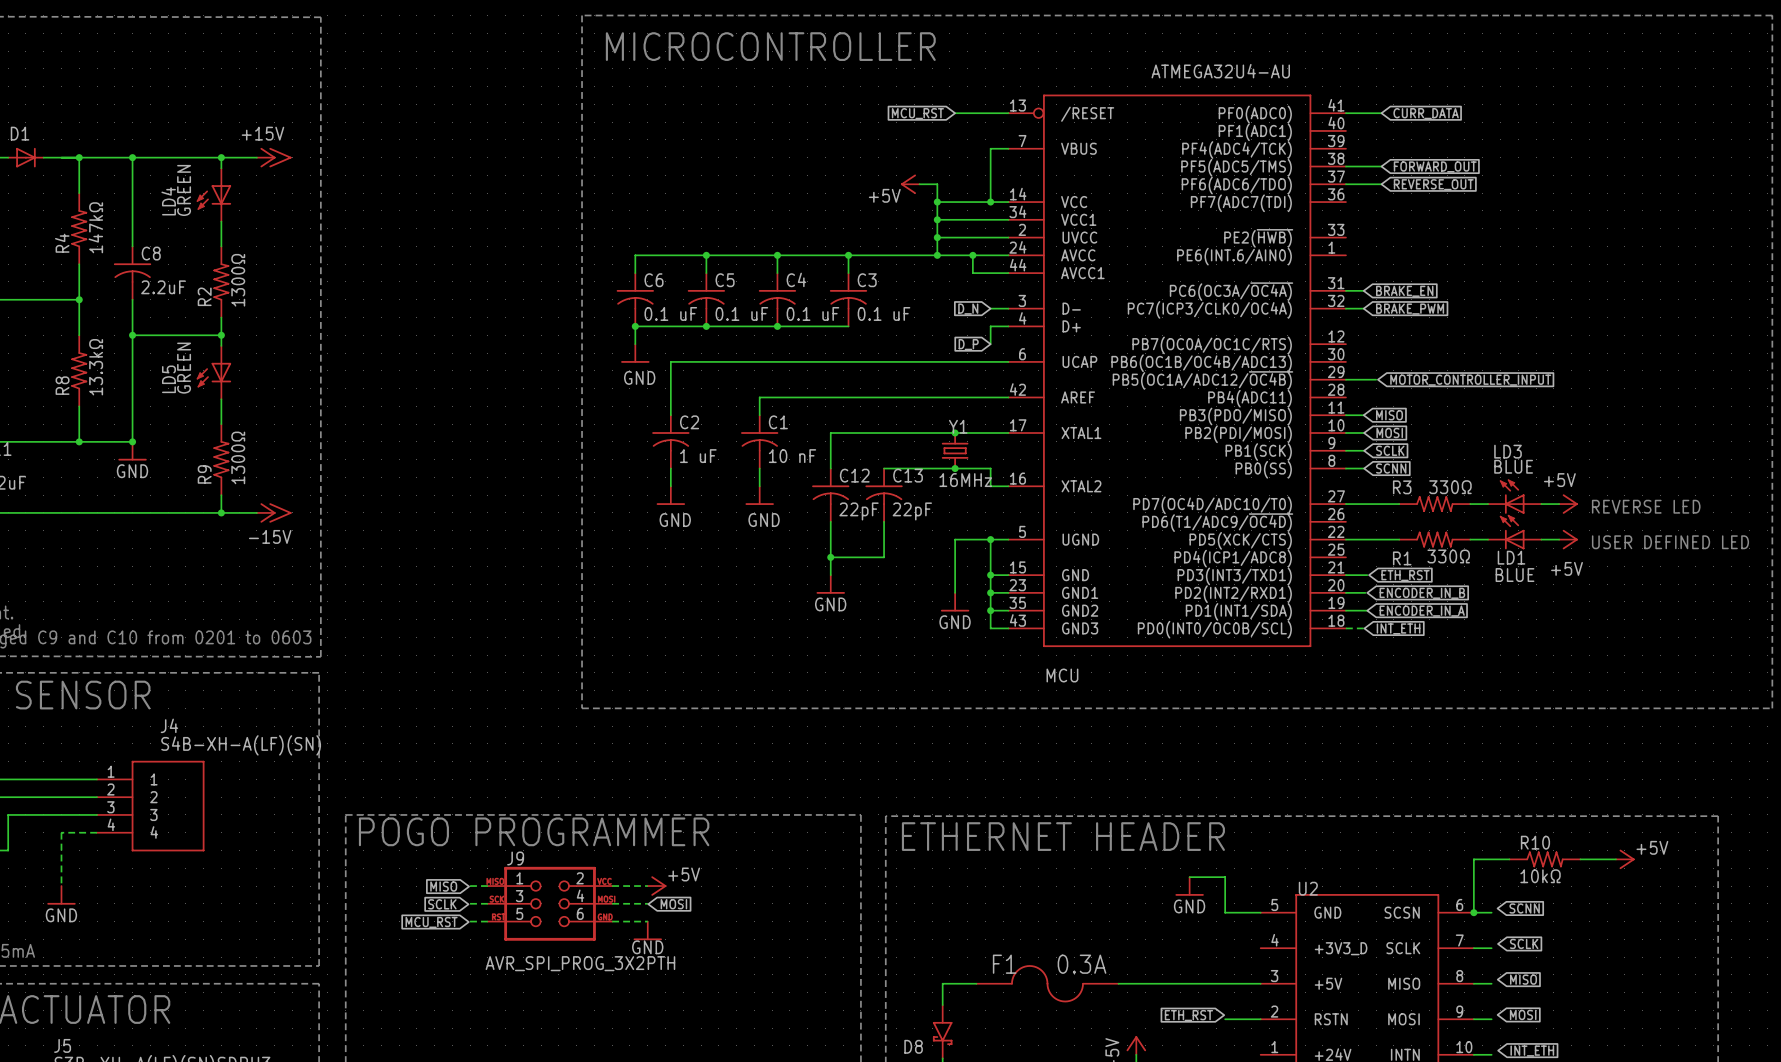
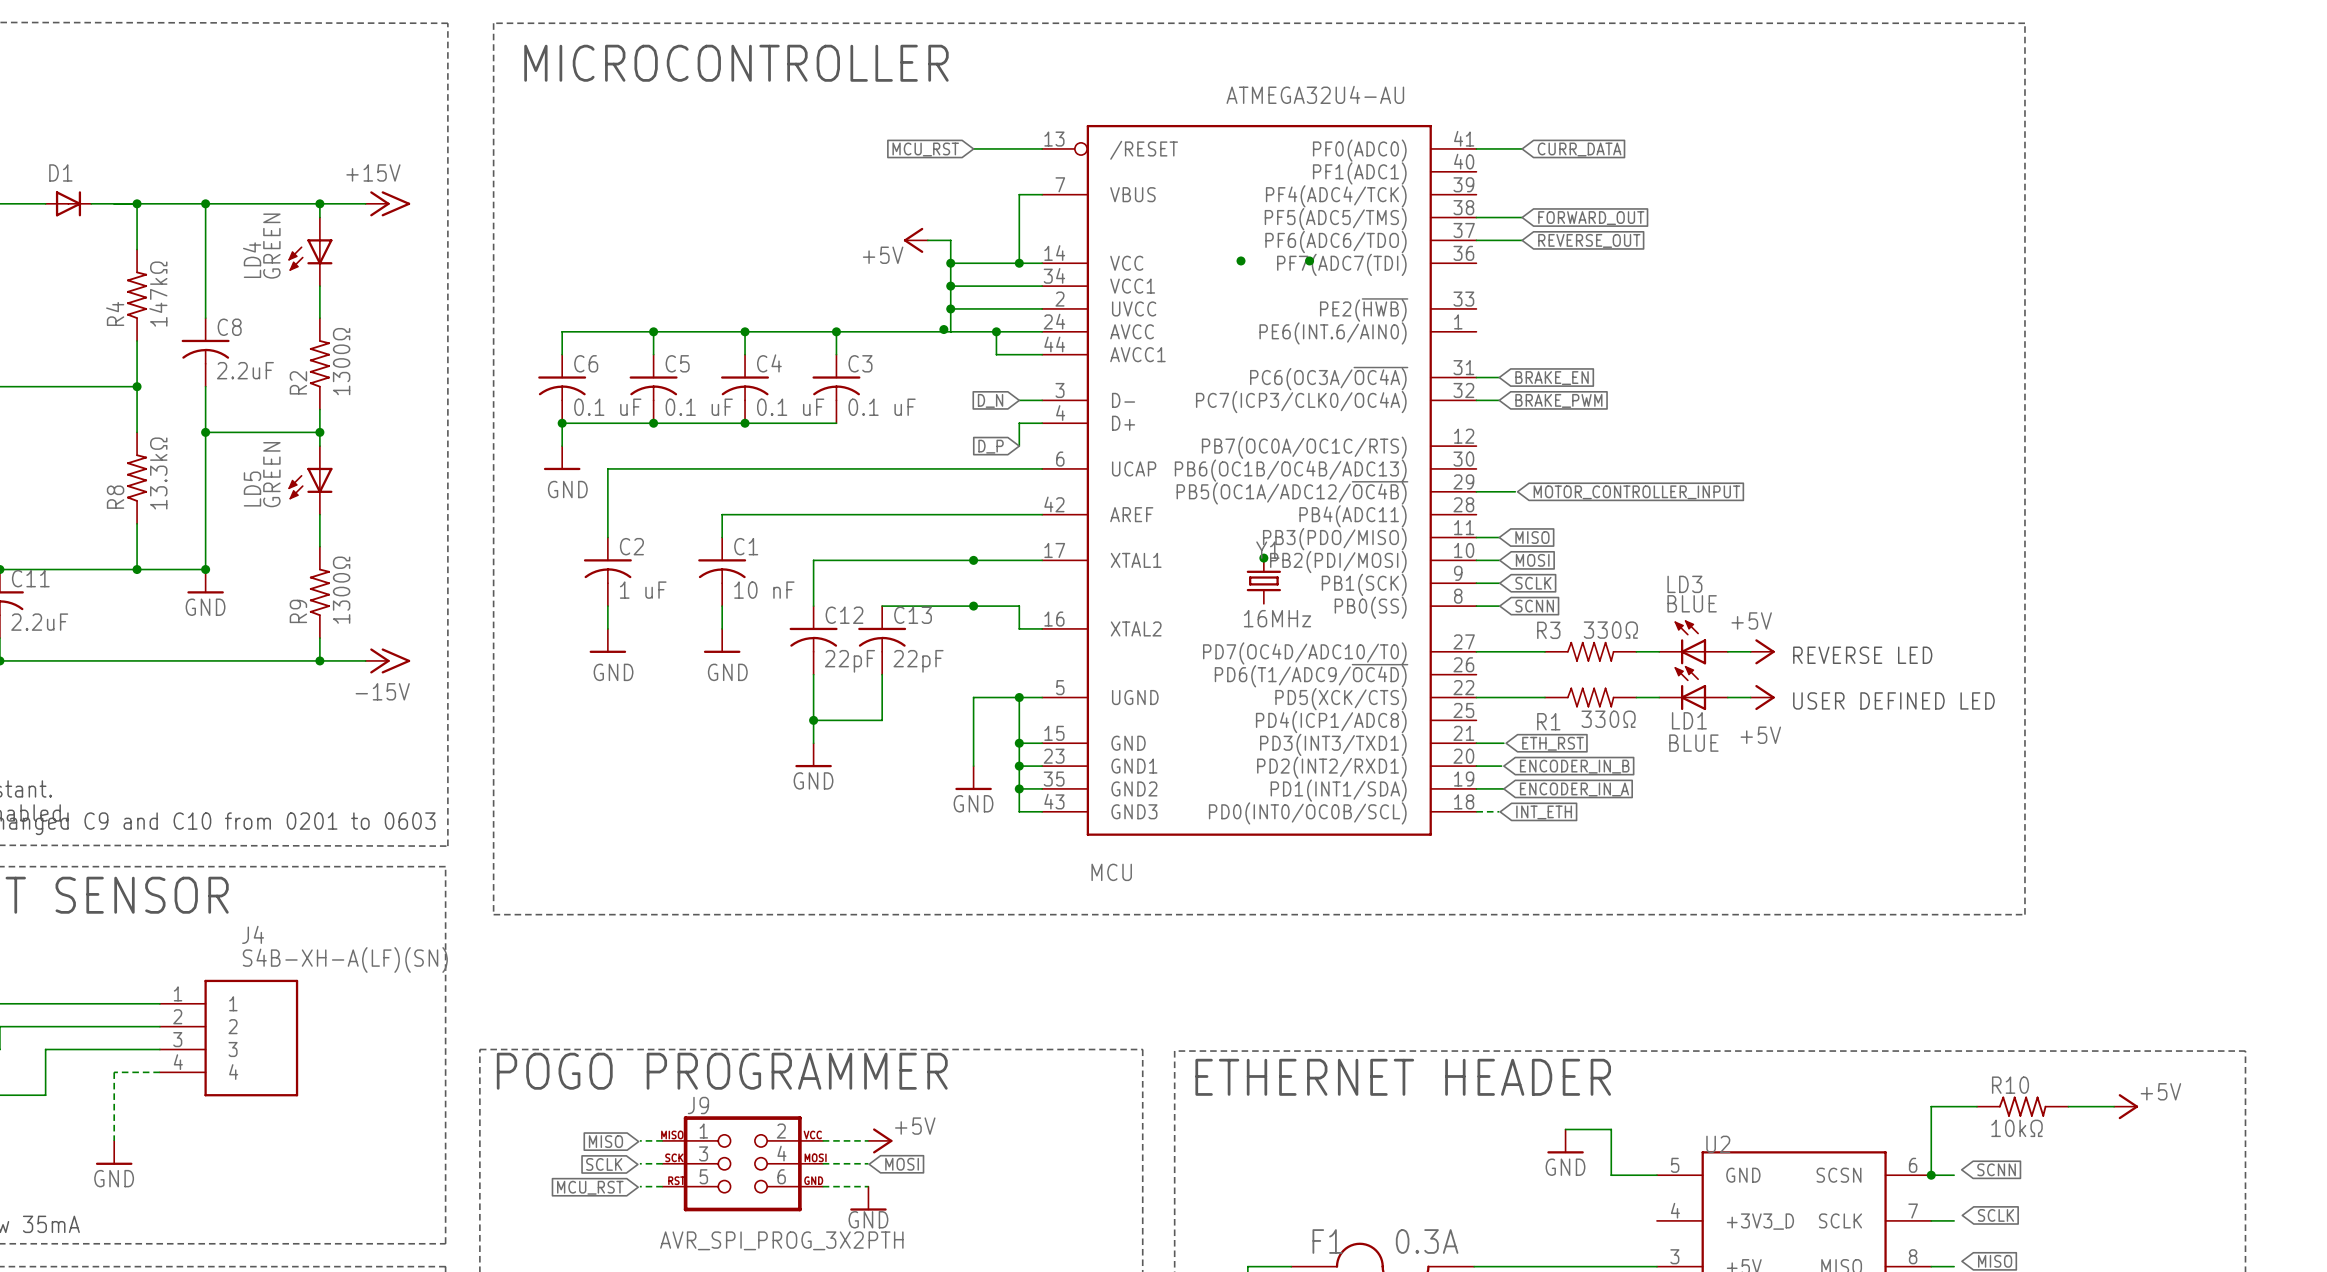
line: (582, 15) (582, 708) (1772, 708) (1772, 15) (582, 15) -> (493, 23) (493, 914) (2024, 914) (2024, 23) (493, 23)
text: MICROCONTROLLER (770, 46) -> none
text: none -> MICROCONTROLLER (736, 63)
global label: MCU_RST (917, 113) -> none
wire: (955, 113) (1008, 113) -> none
wire: (1345, 113) (1381, 113) -> none
global label: CURR_DATA (1426, 113) -> none
wire: none -> (973, 148) (1042, 148)
wire: none -> (1476, 148) (1522, 148)
global label: none -> MCU_RST (925, 149)
global label: none -> CURR_DATA (1579, 149)
wire: (1008, 148) (990, 148) (990, 202) -> none
wire: none -> (1042, 194) (1019, 194) (1019, 263)
wire: (1345, 166) (1381, 166) -> none
global label: FORWARD_OUT (1435, 166) -> none
wire: none -> (1476, 217) (1522, 217)
global label: none -> FORWARD_OUT (1591, 218)
power symbol: +5V (910, 184) -> none
wire: (919, 184) (937, 184) (937, 255) -> none
wire: (1345, 184) (1381, 184) -> none
global label: REVERSE_OUT (1433, 184) -> none
power symbol: none -> +5V (915, 240)
wire: none -> (927, 240) (950, 240) (950, 331)
wire: none -> (1476, 240) (1522, 240)
global label: none -> REVERSE_OUT (1589, 240)
wire: (937, 202) (1008, 202) -> none
wire: none -> (950, 263) (1042, 263)
junction: none -> (950, 263)
junction: none -> (1019, 263)
wire: (937, 219) (1008, 219) -> none
junction: (937, 219) -> none
wire: none -> (950, 286) (1042, 286)
junction: none -> (950, 286)
wire: (937, 237) (1008, 237) -> none
junction: (937, 237) -> none
wire: none -> (950, 308) (1042, 308)
junction: none -> (950, 308)
wire: (706, 255) (706, 273) -> (745, 331) (745, 354)
wire: (777, 255) (777, 273) -> (836, 331) (836, 354)
junction: (777, 255) -> none
wire: (848, 255) (848, 273) -> none
junction: (848, 255) -> none
junction: (937, 255) -> none
wire: (972, 255) (972, 273) (1008, 273) -> none
junction: (972, 255) -> none
wire: (1008, 255) (635, 255) (635, 273) -> none
wire: none -> (653, 331) (653, 354)
junction: none -> (653, 331)
junction: none -> (745, 331)
junction: none -> (836, 331)
wire: none -> (996, 331) (996, 354) (1042, 354)
junction: none -> (996, 331)
wire: none -> (1042, 331) (562, 331) (562, 354)
wire: (1345, 290) (1363, 290) -> none
global label: BRAKE_EN (1404, 291) -> none
wire: none -> (1476, 377) (1499, 377)
global label: none -> BRAKE_EN (1552, 378)
C6 position: (635, 299) -> (562, 388)
C5 position: (706, 299) -> (653, 388)
C4 position: (777, 299) -> (745, 388)
C3 position: (848, 299) -> (836, 388)
wire: (990, 308) (1008, 308) -> (1476, 400) (1499, 400)
wire: (1345, 308) (1363, 308) -> none
global label: D_N (968, 309) -> none
global label: BRAKE_PWM (1410, 309) -> none
global label: none -> D_N (990, 400)
wire: none -> (1019, 400) (1042, 400)
global label: none -> BRAKE_PWM (1558, 400)
junction: (635, 326) -> none
junction: (706, 326) -> none
junction: (777, 326) -> none
wire: (848, 326) (635, 326) (635, 344) -> none
wire: (1008, 326) (990, 326) (990, 344) -> none
junction: none -> (562, 423)
junction: none -> (653, 423)
junction: none -> (745, 423)
wire: none -> (836, 423) (562, 423) (562, 446)
wire: none -> (1042, 423) (1019, 423) (1019, 446)
global label: D_P (968, 344) -> none
global label: none -> D_P (991, 446)
power symbol: GND (635, 353) -> none
power symbol: none -> GND (562, 458)
wire: (1008, 361) (670, 361) (670, 415) -> none
wire: none -> (1042, 468) (607, 468) (607, 537)
MCU: ATMEGA32U4-AU (1177, 370) -> none
MCU: none -> ATMEGA32U4-AU (1259, 480)
wire: (1345, 379) (1376, 379) -> none
global label: MOTOR_CONTROLLER_INPUT (1470, 380) -> none
wire: none -> (1476, 491) (1515, 491)
global label: none -> MOTOR_CONTROLLER_INPUT (1636, 492)
wire: (1008, 397) (759, 397) (759, 415) -> none
wire: none -> (1042, 514) (722, 514) (722, 537)
wire: (1345, 415) (1363, 415) -> none
global label: MISO (1389, 415) -> none
wire: none -> (1476, 537) (1499, 537)
global label: none -> MISO (1532, 537)
wire: (1008, 433) (830, 433) (830, 468) -> none
wire: (1345, 433) (1363, 433) -> (1636, 651) (1659, 651)
global label: MOSI (1389, 433) -> none
junction: none -> (973, 560)
wire: none -> (1042, 560) (813, 560) (813, 606)
wire: none -> (1476, 560) (1499, 560)
global label: none -> MOSI (1532, 560)
C2 position: (670, 441) -> (607, 571)
C1 position: (759, 441) -> (722, 571)
wire: (1345, 450) (1363, 450) -> none
global label: SCLK (1390, 450) -> none
wire: none -> (1476, 583) (1499, 583)
global label: none -> SCLK (1533, 583)
wire: (670, 468) (670, 486) -> (722, 606) (722, 628)
wire: (759, 468) (759, 486) -> none
wire: (884, 468) (990, 468) (990, 486) (1008, 486) -> none
junction: (955, 468) -> none
wire: (1345, 468) (1363, 468) -> (1636, 697) (1659, 697)
global label: SCNN (1391, 468) -> none
wire: none -> (607, 606) (607, 628)
wire: none -> (882, 606) (1019, 606) (1019, 628) (1042, 628)
junction: none -> (973, 606)
global label: none -> SCNN (1534, 606)
power symbol: GND (670, 495) -> none
power symbol: GND (759, 495) -> none
C12 position: (830, 495) -> (813, 640)
C13 position: (884, 495) -> (882, 640)
LD3 position: (1514, 496) -> (1693, 642)
power symbol: none -> GND (607, 640)
power symbol: none -> GND (722, 640)
wire: (1345, 504) (1399, 504) -> none
R3 position: (1434, 504) -> (1590, 651)
wire: (1470, 504) (1488, 504) -> (1727, 651) (1750, 651)
wire: (1541, 504) (1559, 504) -> none
power symbol: +5V (1568, 504) -> none
wire: none -> (1476, 651) (1544, 651)
power symbol: none -> +5V (1762, 651)
text: REVERSE LED (1646, 506) -> none
text: none -> REVERSE LED (1862, 655)
wire: (830, 521) (830, 575) -> none
wire: (884, 521) (884, 557) (830, 557) -> none
wire: none -> (813, 674) (813, 743)
wire: none -> (882, 674) (882, 720) (813, 720)
LD1 position: (1514, 532) -> (1693, 688)
wire: (990, 539) (990, 628) (1008, 628) -> none
junction: (990, 539) -> none
wire: (1008, 539) (955, 539) (955, 592) -> none
wire: (1345, 539) (1399, 539) -> none
R1 position: (1434, 539) -> (1590, 697)
wire: (1470, 539) (1488, 539) -> (1727, 697) (1750, 697)
wire: (1541, 539) (1559, 539) -> none
power symbol: +5V (1568, 539) -> none
wire: none -> (1019, 697) (1019, 811) (1042, 811)
junction: none -> (1019, 697)
wire: none -> (1042, 697) (973, 697) (973, 766)
wire: none -> (1476, 697) (1544, 697)
power symbol: none -> +5V (1762, 697)
text: USER DEFINED LED (1670, 542) -> none
text: none -> USER DEFINED LED (1893, 700)
junction: (830, 557) -> none
junction: none -> (813, 720)
wire: (990, 575) (1008, 575) -> (1476, 606) (1499, 606)
junction: (990, 575) -> none
wire: (1345, 575) (1367, 575) -> none
global label: ETH_RST (1405, 575) -> none
wire: none -> (1019, 743) (1042, 743)
junction: none -> (1019, 743)
wire: none -> (1476, 743) (1503, 743)
global label: none -> ETH_RST (1553, 743)
power symbol: GND (830, 584) -> none
power symbol: none -> GND (813, 755)
wire: (990, 592) (1008, 592) -> none
junction: (990, 592) -> none
wire: (1345, 592) (1365, 592) -> none
global label: ENCODER_IN_B (1422, 593) -> none
wire: none -> (1019, 766) (1042, 766)
junction: none -> (1019, 766)
wire: none -> (1476, 766) (1501, 766)
global label: none -> ENCODER_IN_B (1574, 766)
power symbol: GND (955, 602) -> none
power symbol: none -> GND (973, 778)
wire: (990, 610) (1008, 610) -> (1476, 811) (1499, 811)
junction: (990, 610) -> none
wire: (1345, 610) (1367, 610) -> none
global label: ENCODER_IN_A (1422, 611) -> none
wire: none -> (1019, 788) (1042, 788)
junction: none -> (1019, 788)
wire: none -> (1476, 788) (1503, 788)
global label: none -> ENCODER_IN_A (1574, 789)
wire: (1345, 628) (1363, 628) -> none
global label: INT_ETH (1398, 628) -> none
global label: none -> INT_ETH (1544, 812)

